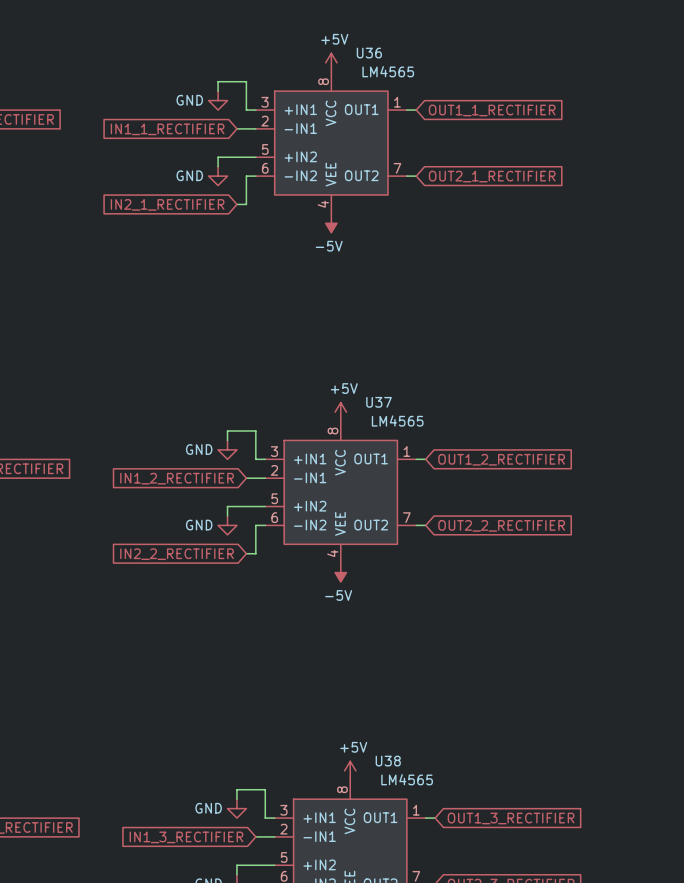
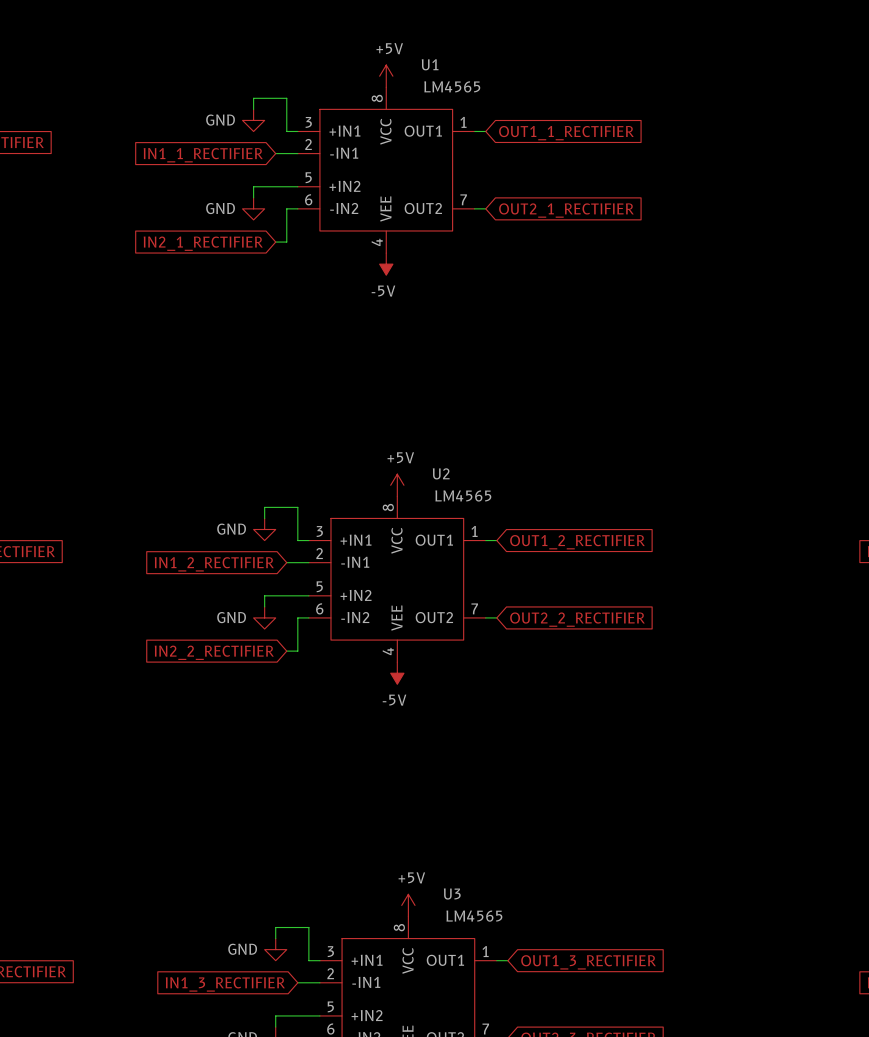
U36 name: U36 (369, 53) -> U1 (430, 64)
U37 name: U37 (379, 402) -> U2 (441, 473)
U38 name: U38 (388, 761) -> U3 (452, 893)

